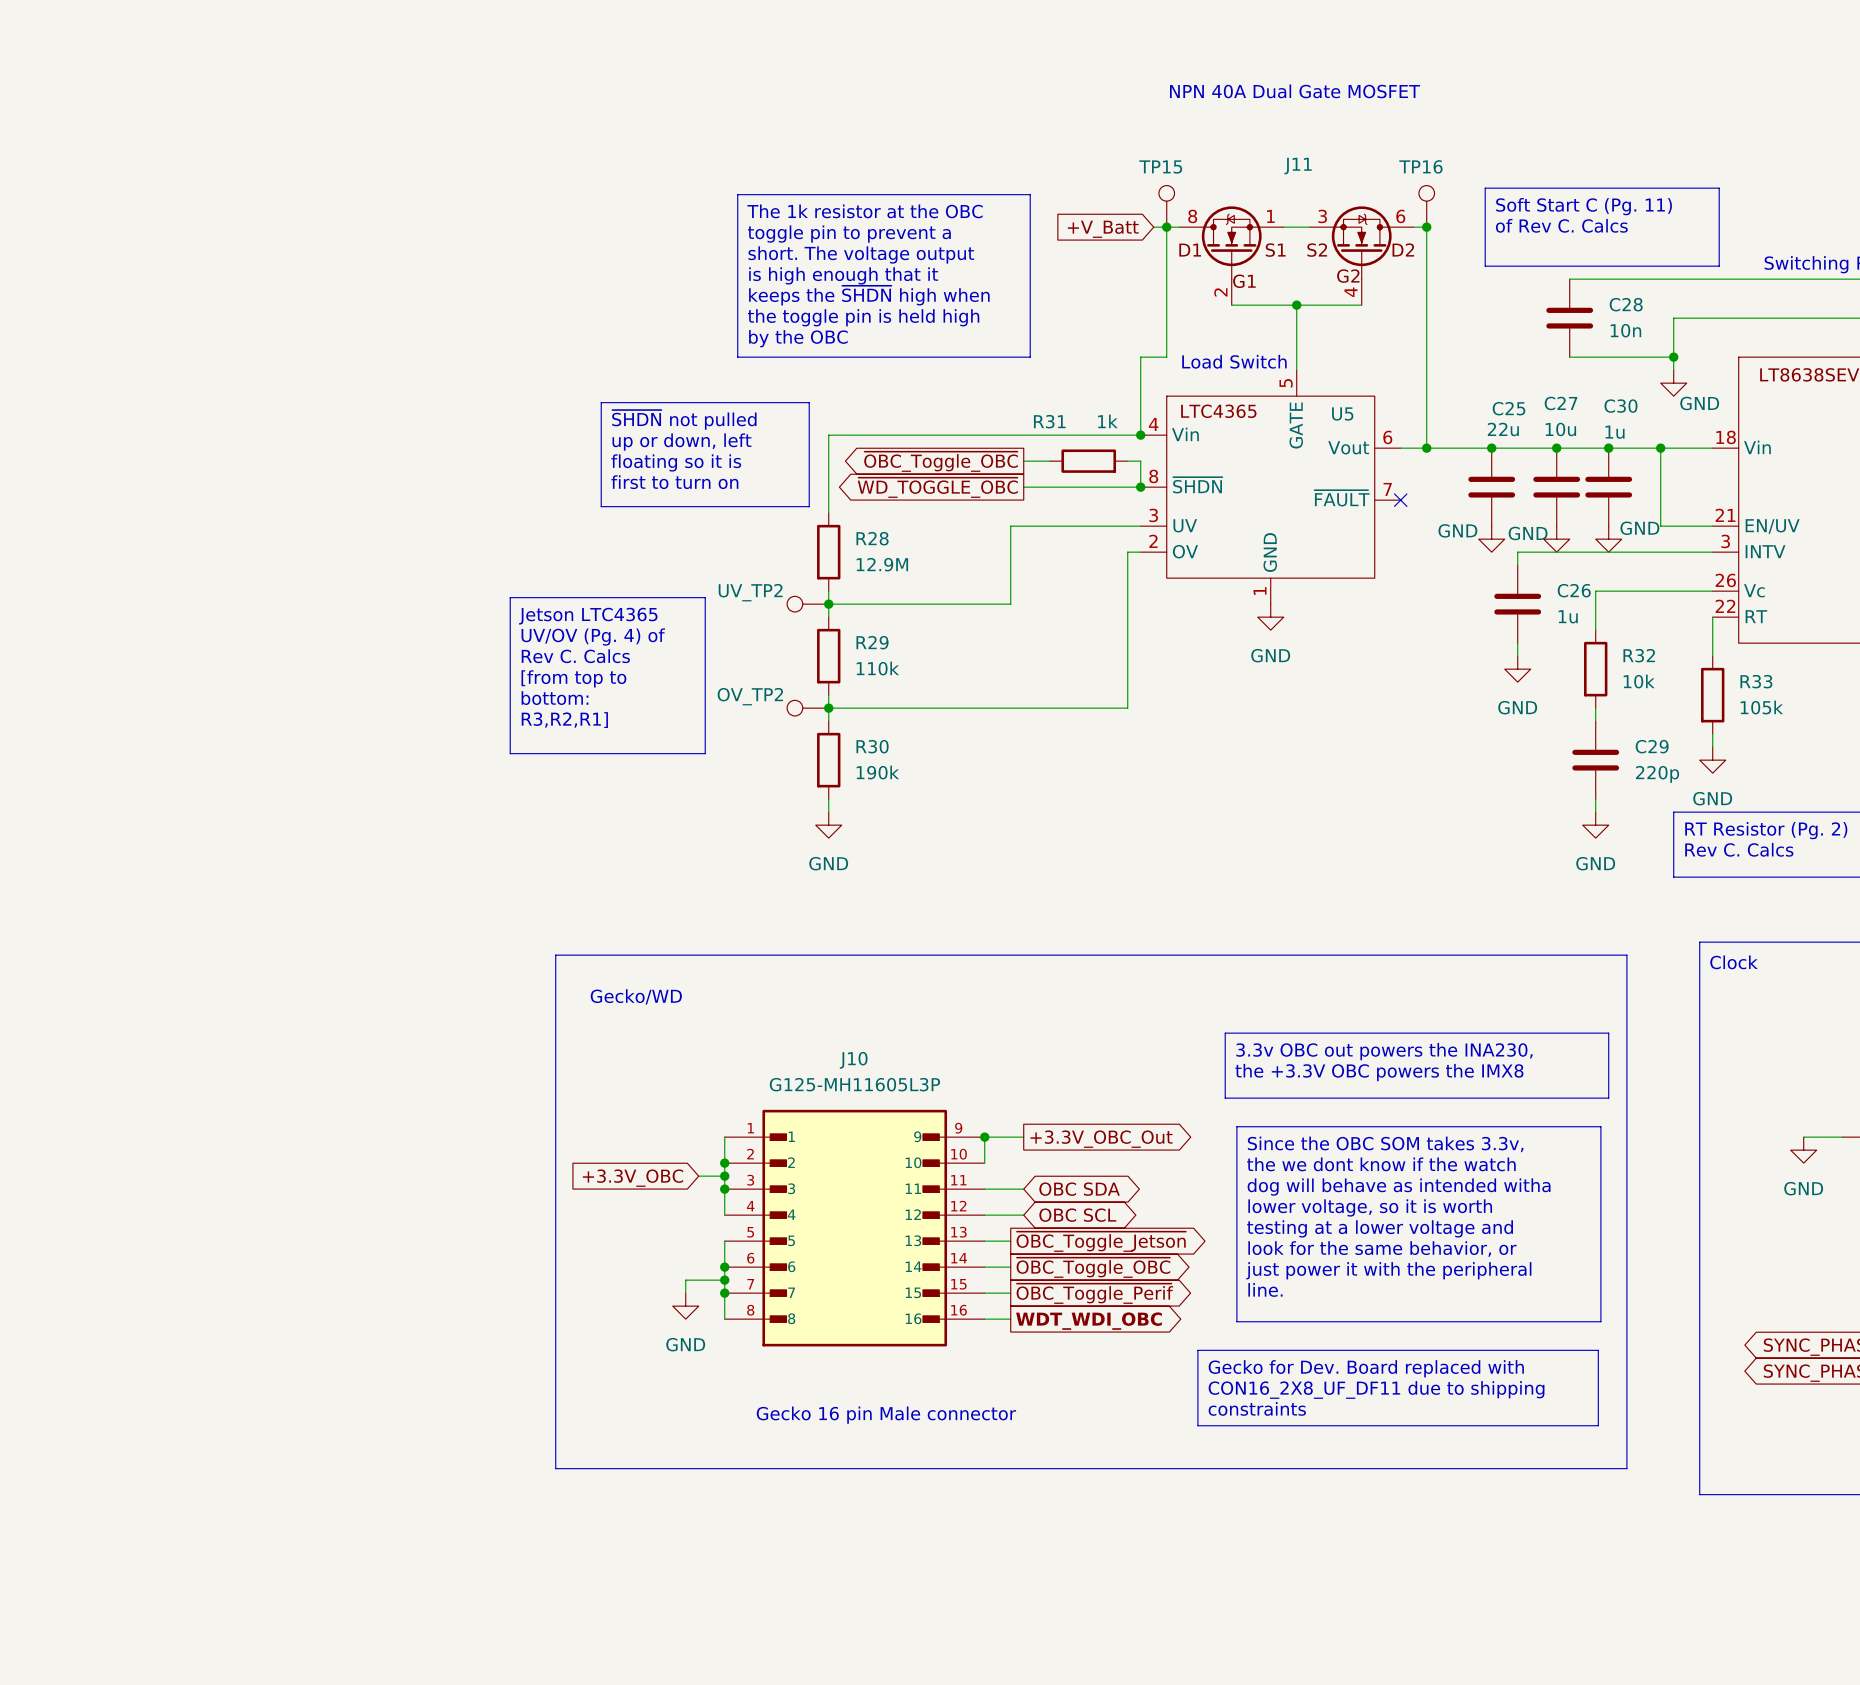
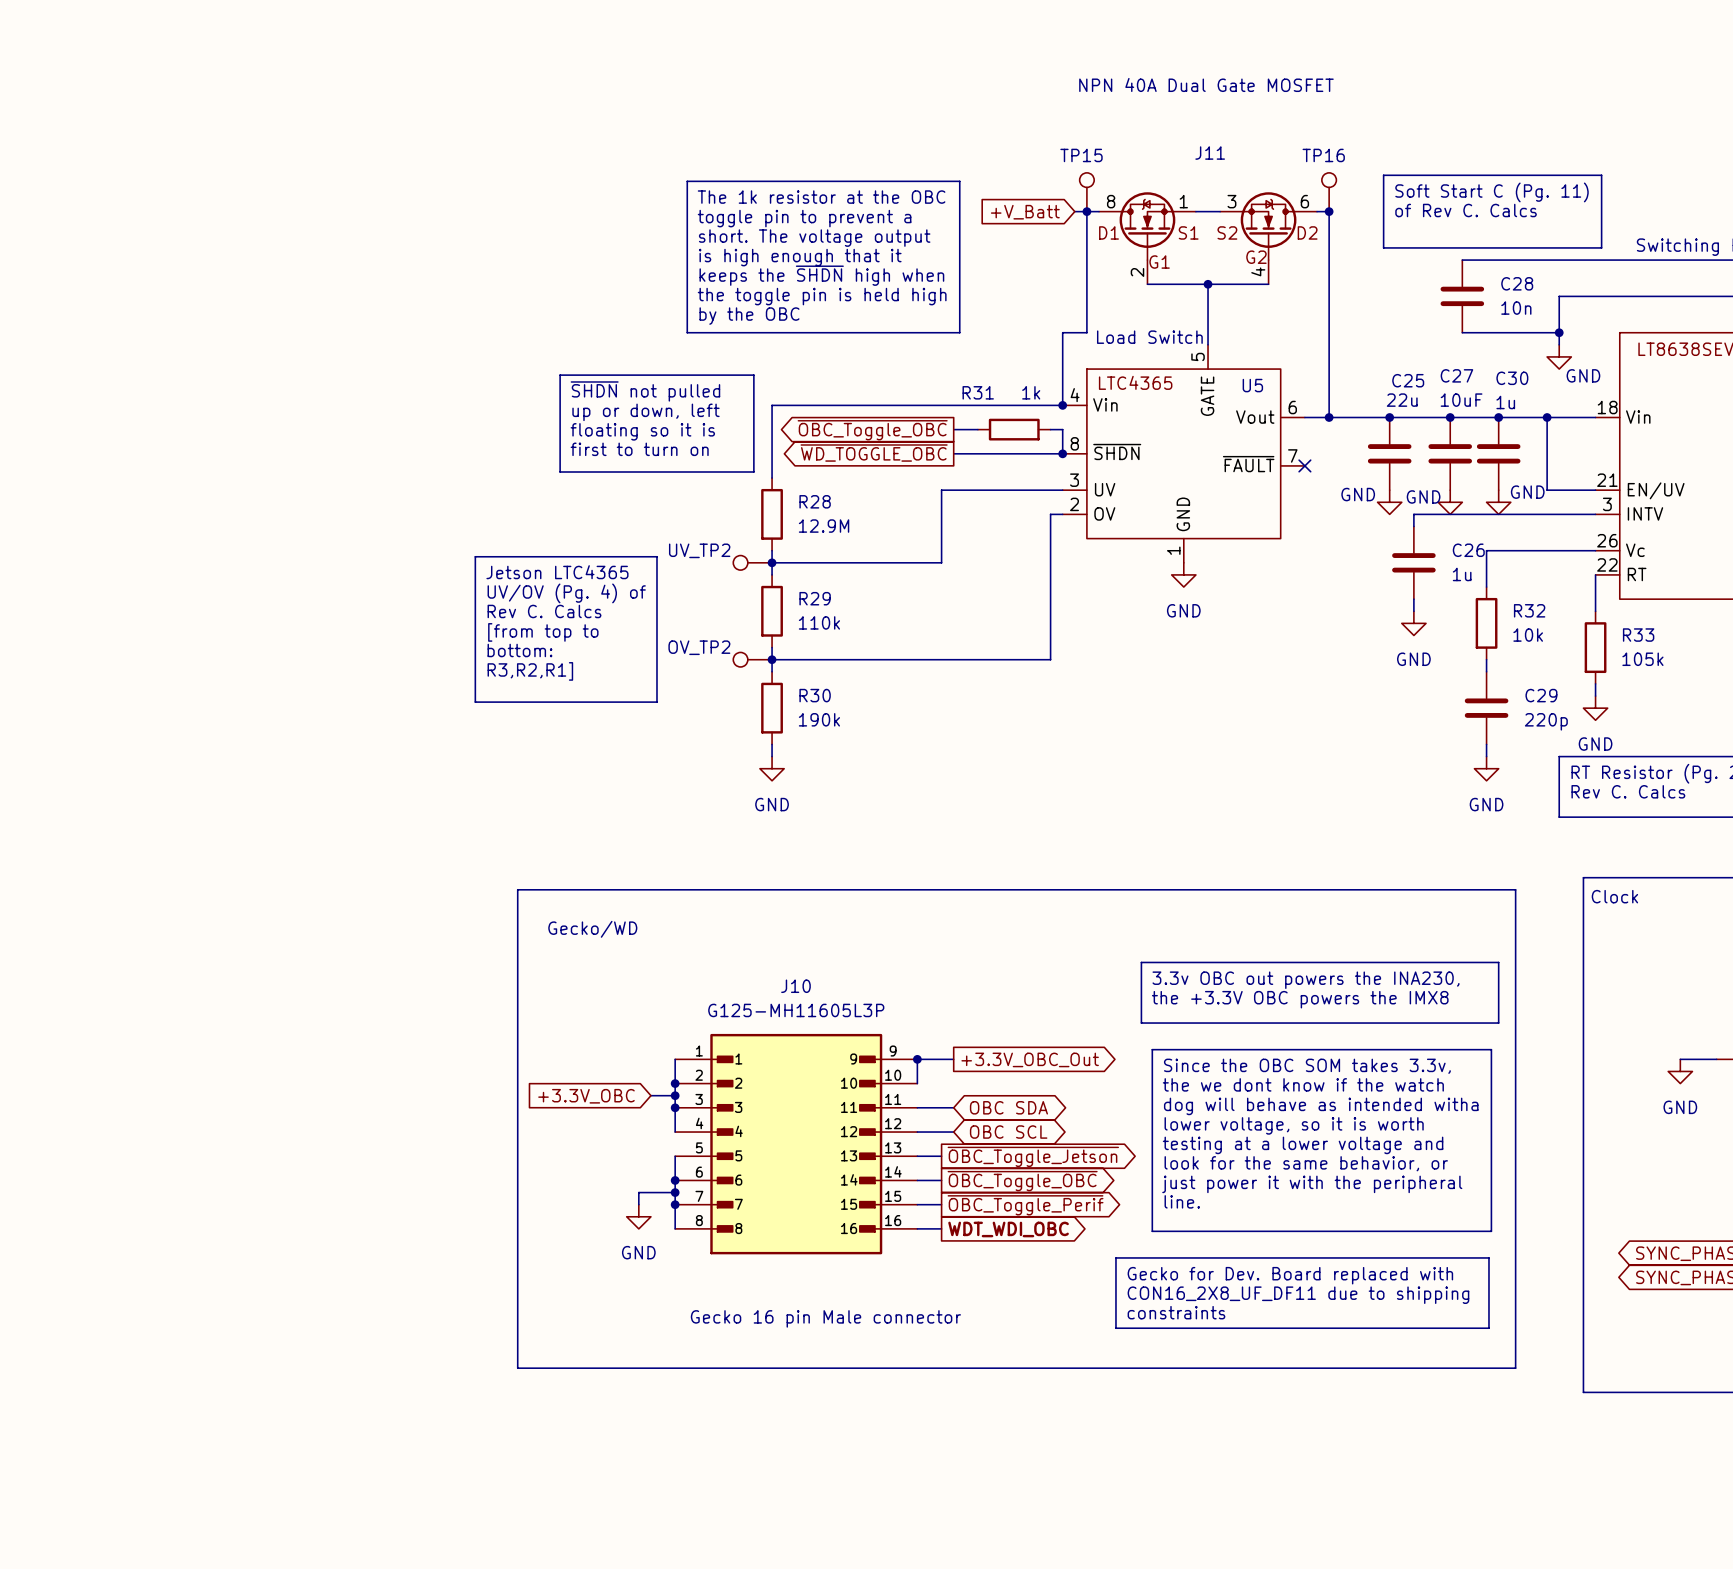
C27 value: 10u (1560, 429) -> 10uF (1461, 400)

